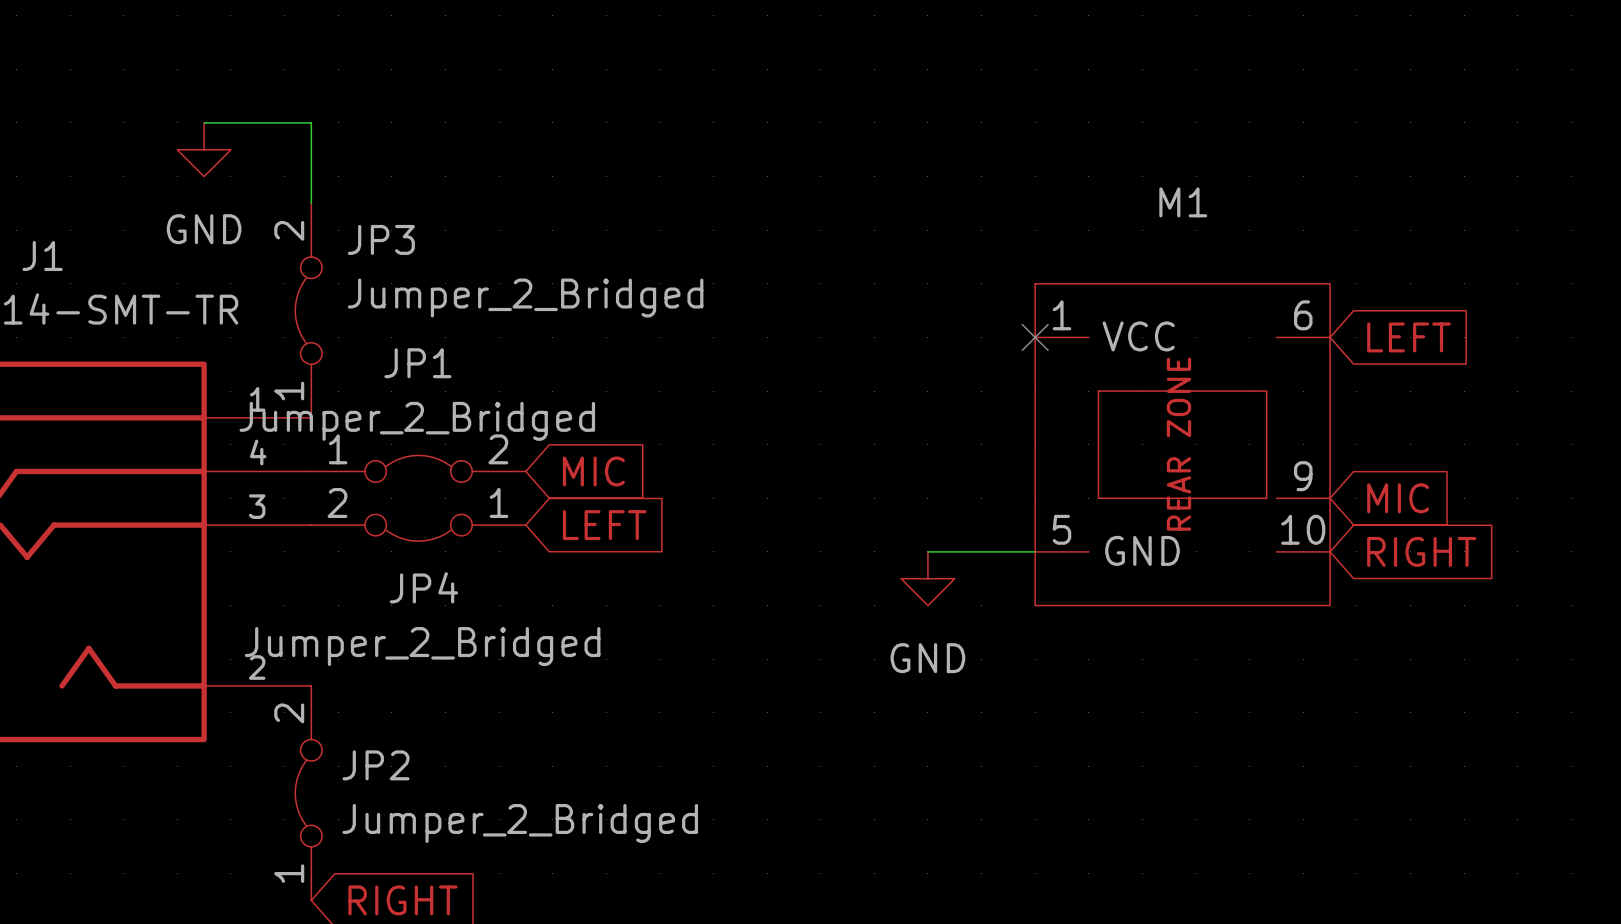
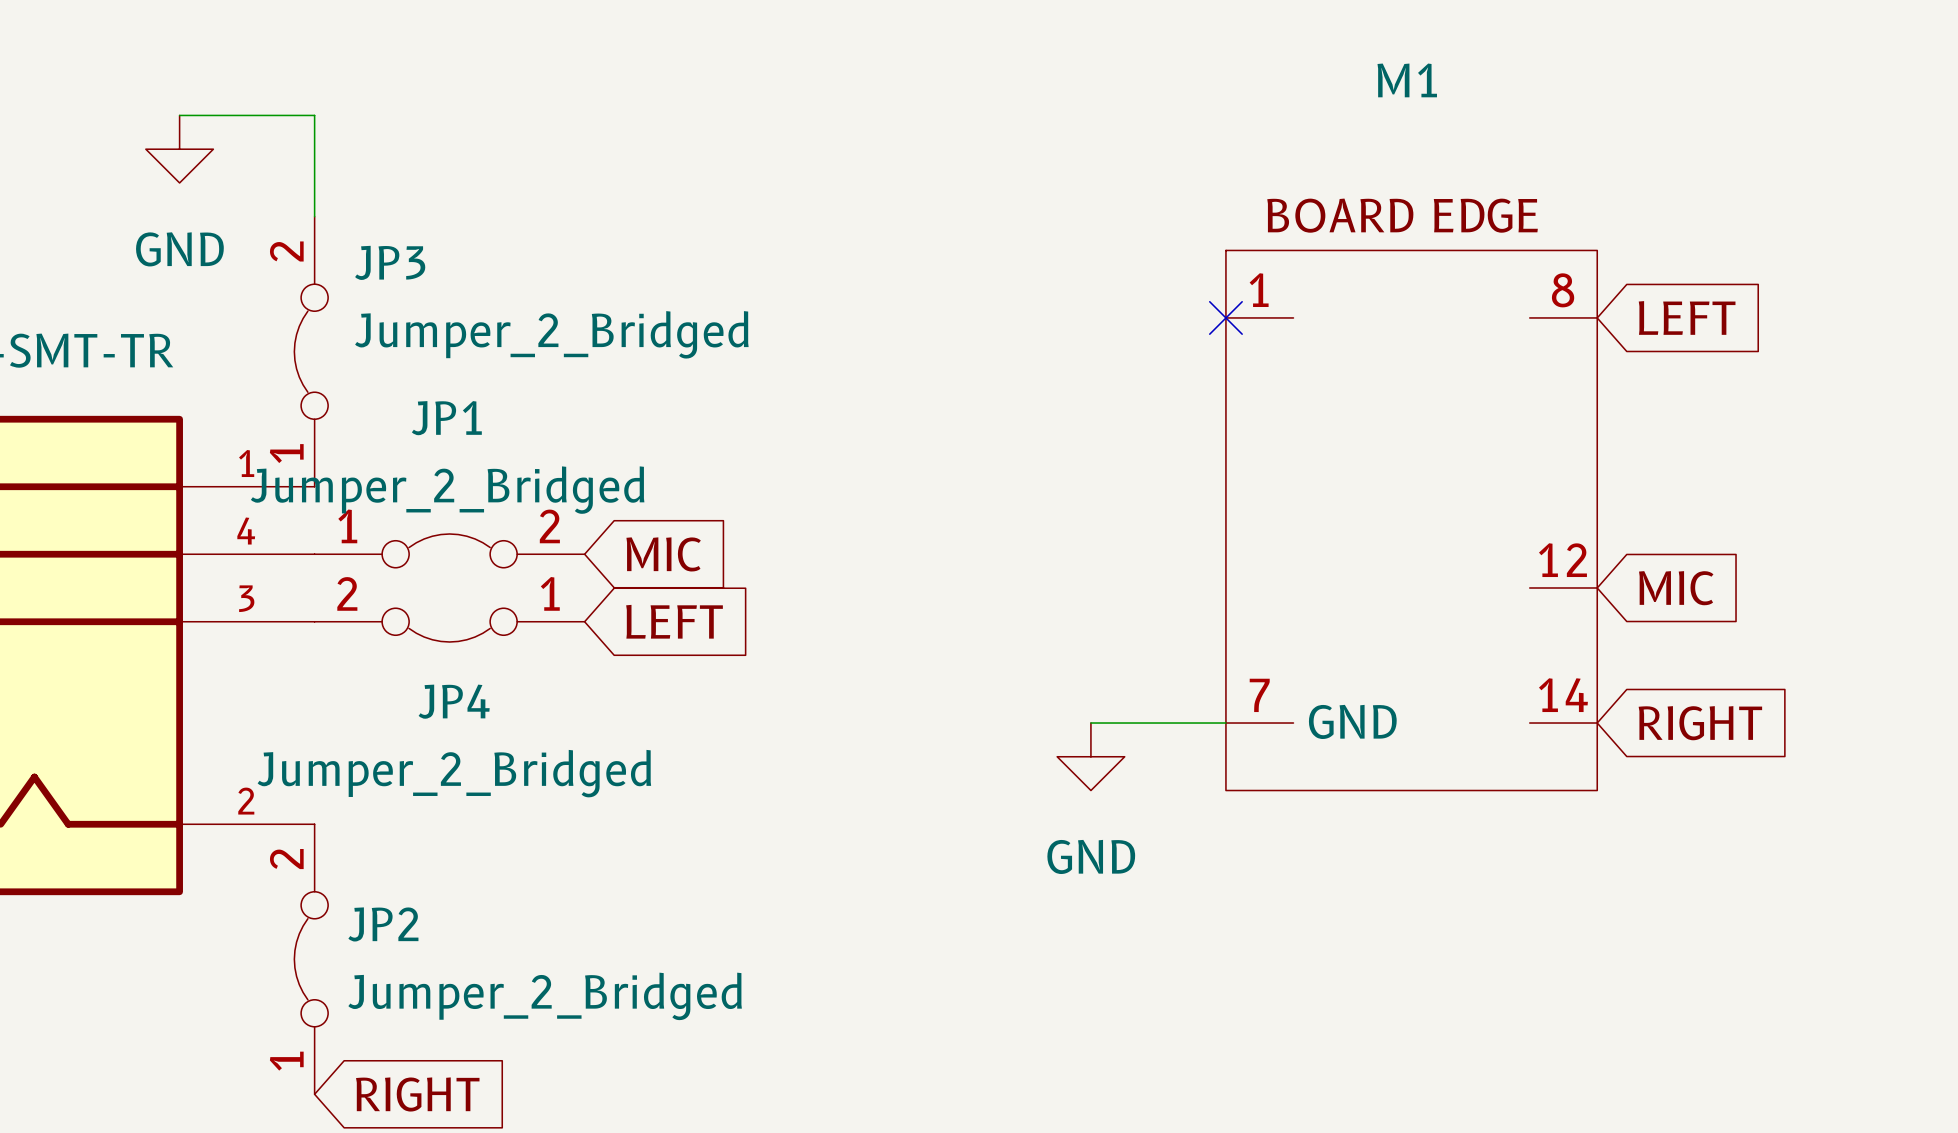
M1 name position: M1 (1183, 202) -> M1 (1407, 80)
M1 symbol: [1035, 283, 1331, 606] -> [1225, 250, 1598, 791]
no-connect mark position: (1035, 337) -> (1225, 317)
global label position: LEFT (1408, 337) -> LEFT (1687, 317)
wire: (927, 551) (1035, 551) -> (1090, 723) (1225, 723)
global label position: RIGHT (1421, 551) -> RIGHT (1700, 723)
power symbol position: GND (927, 578) -> GND (1090, 756)

